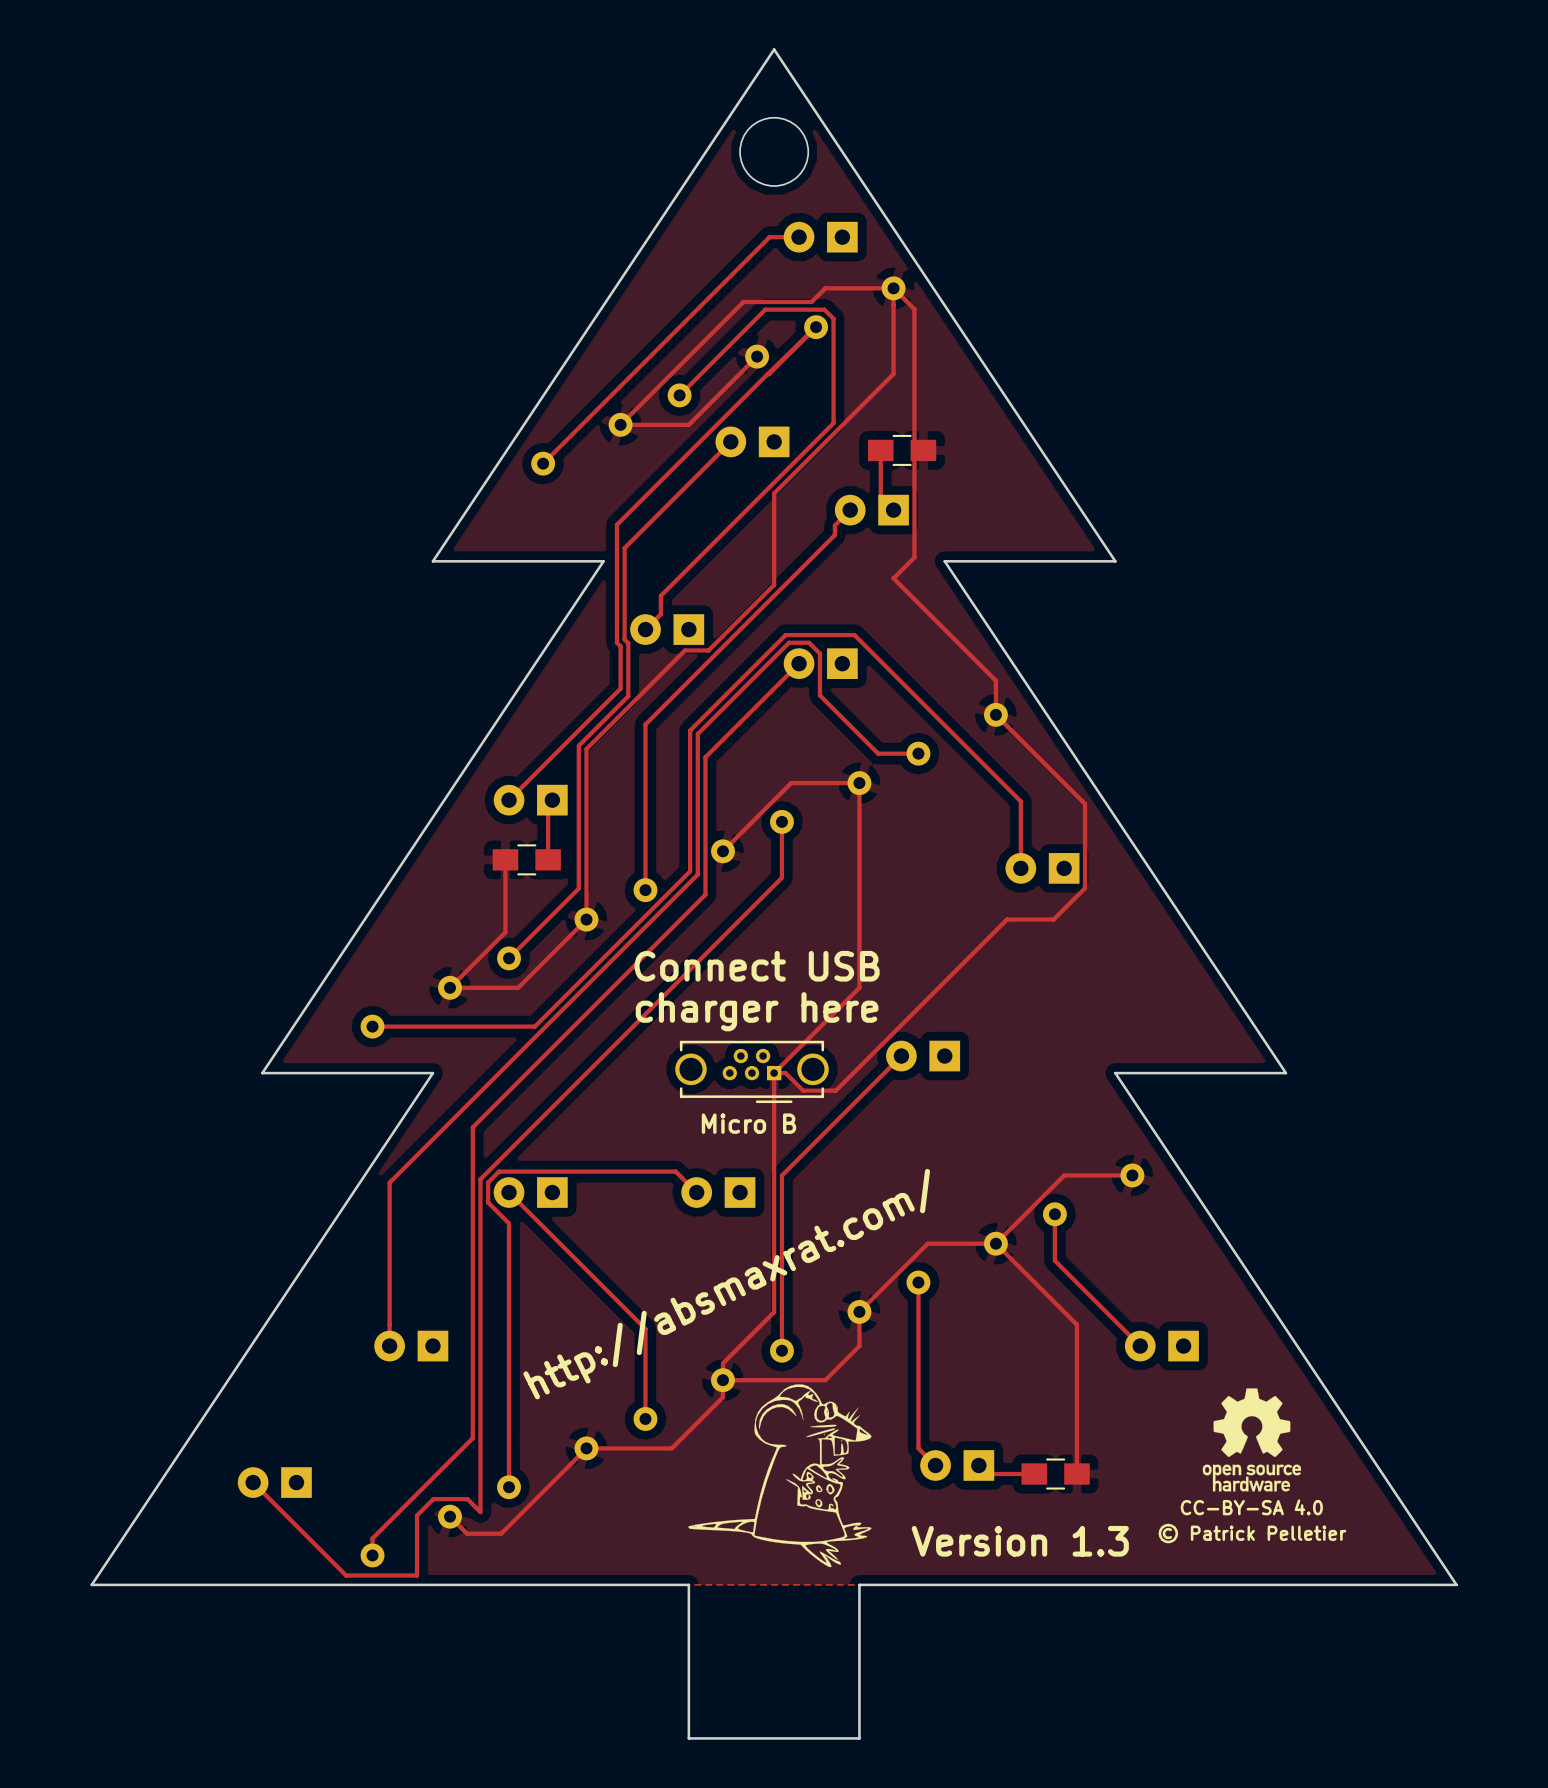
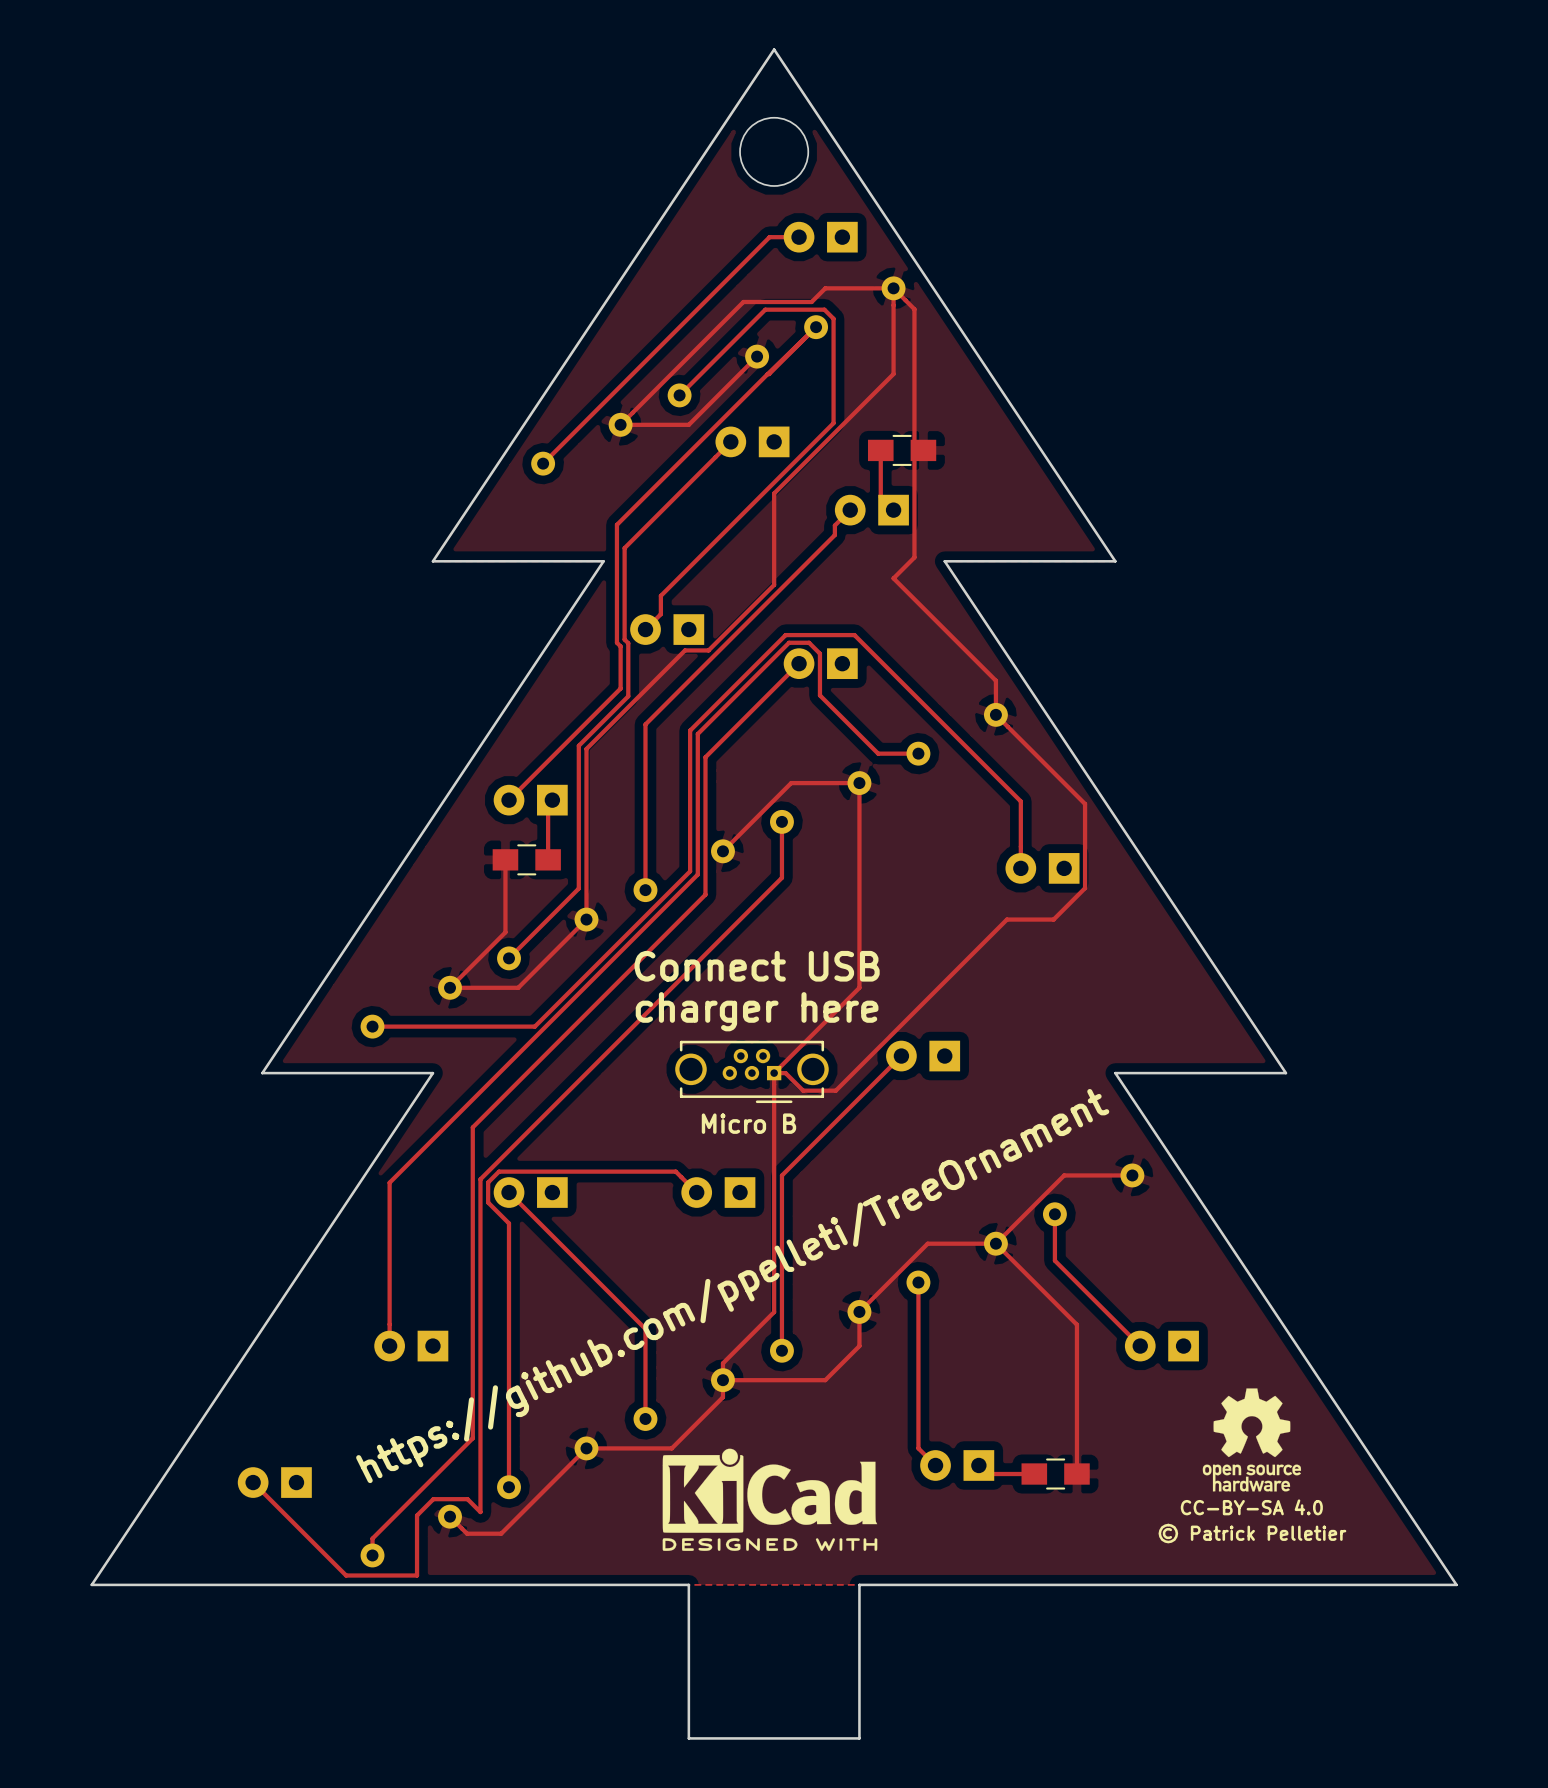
text: http://absmaxrat.com/ (726, 1284) -> https://github.com/ppelleti/TreeOrnament (732, 1286)
drawing: [688, 1384, 872, 1568] -> none
drawing: none -> [662, 1448, 878, 1551]
text: Version 1.3 (1020, 1541) -> none

